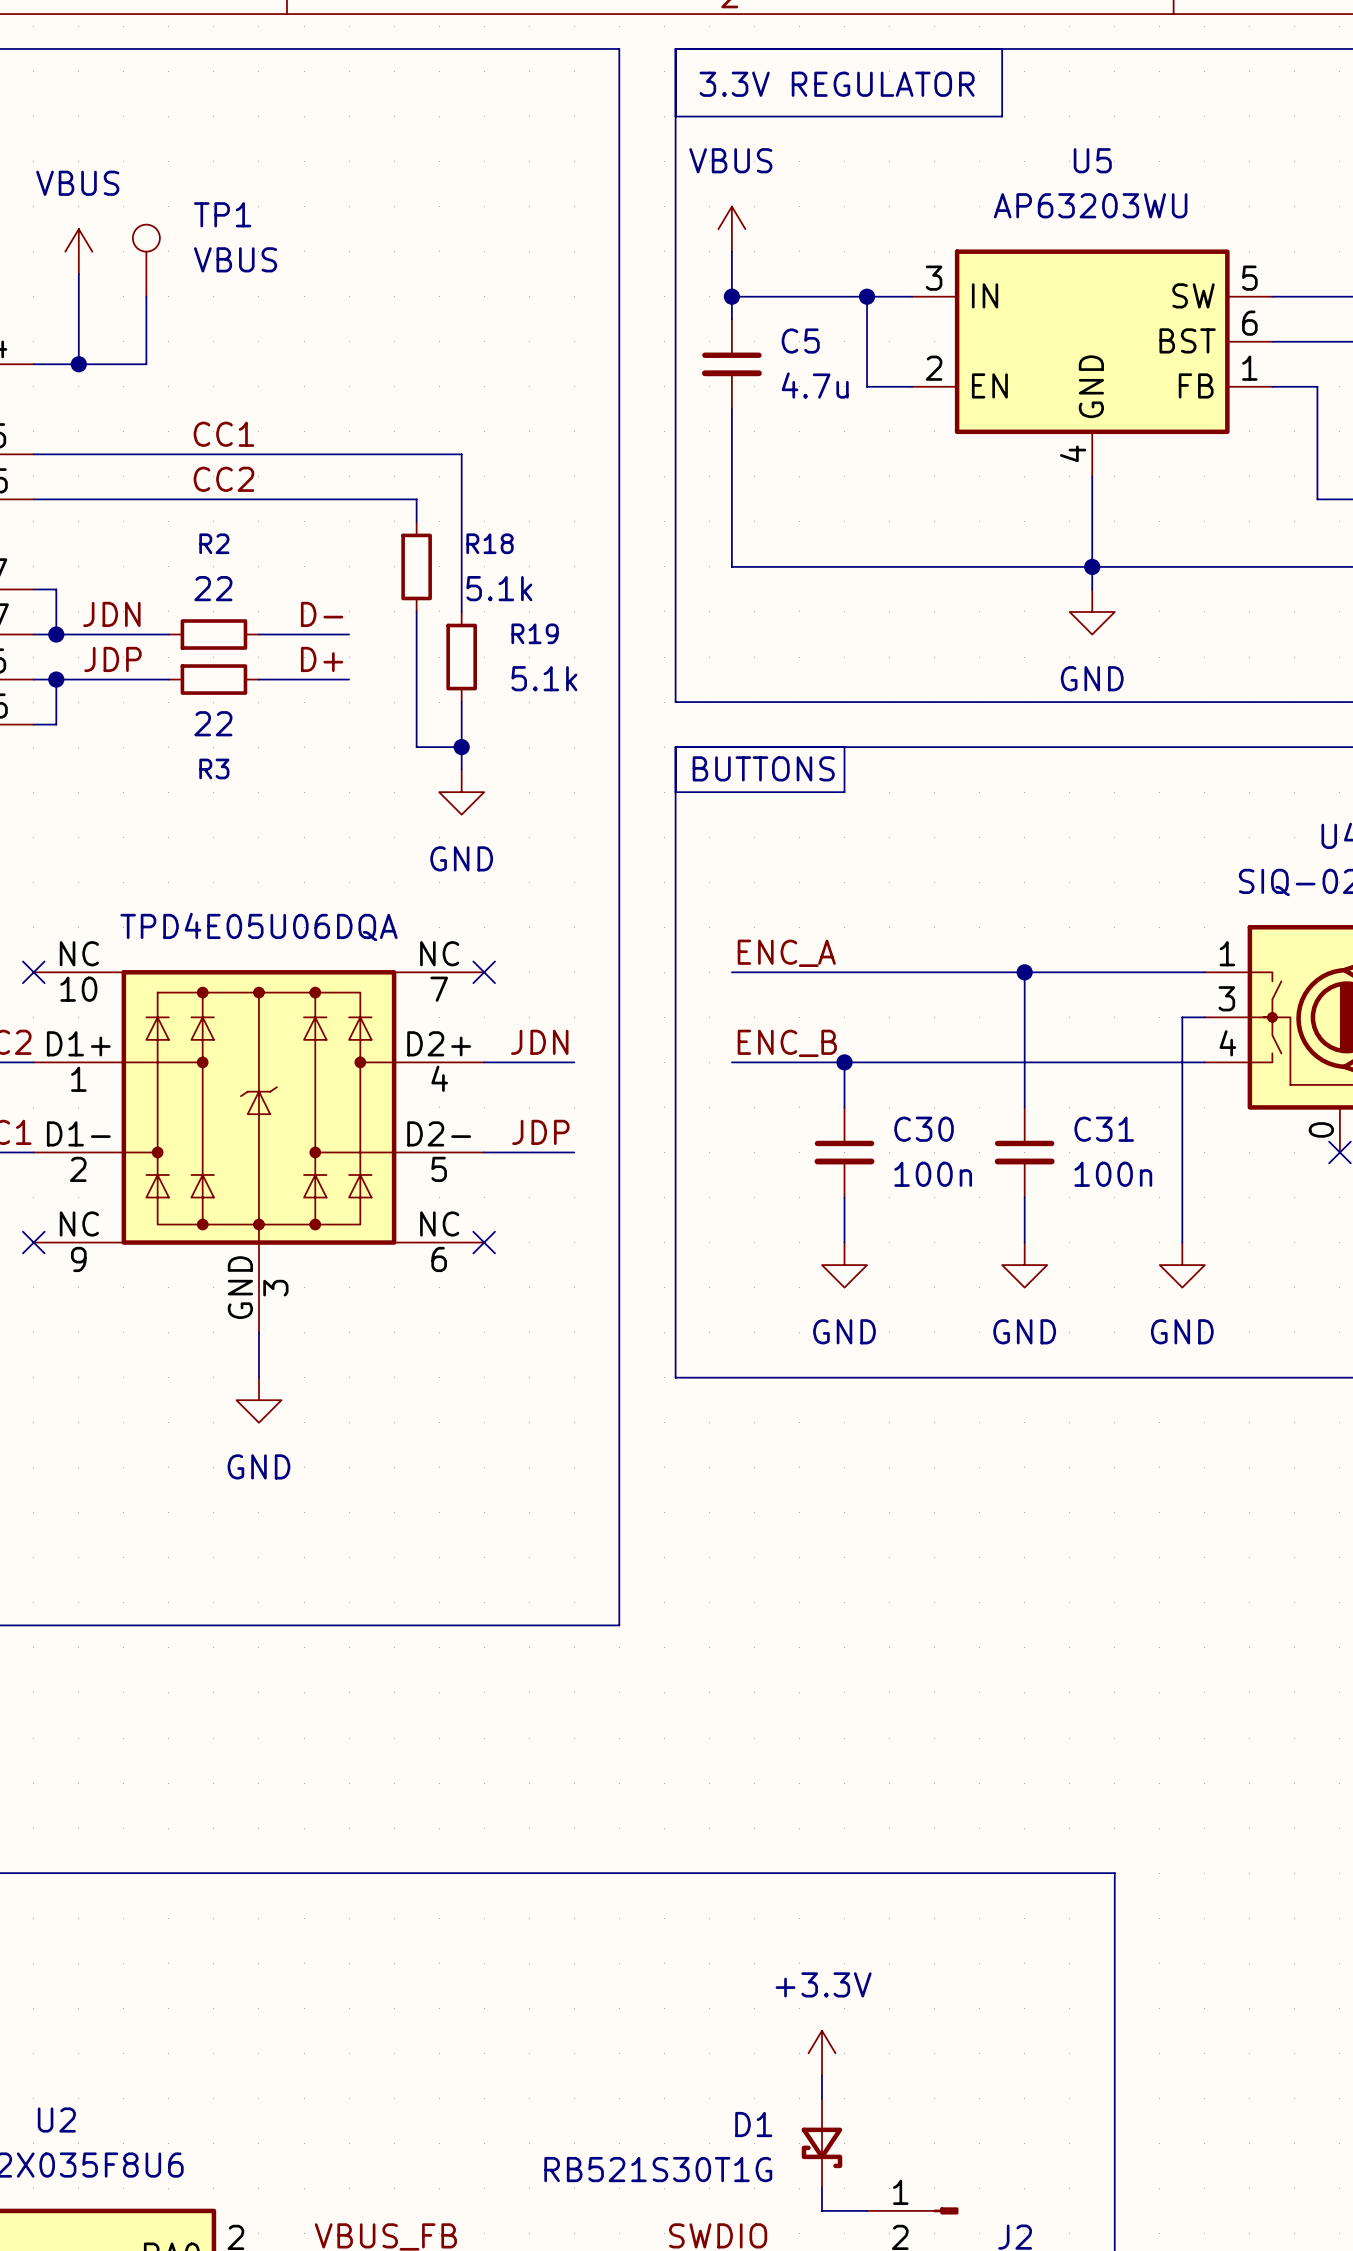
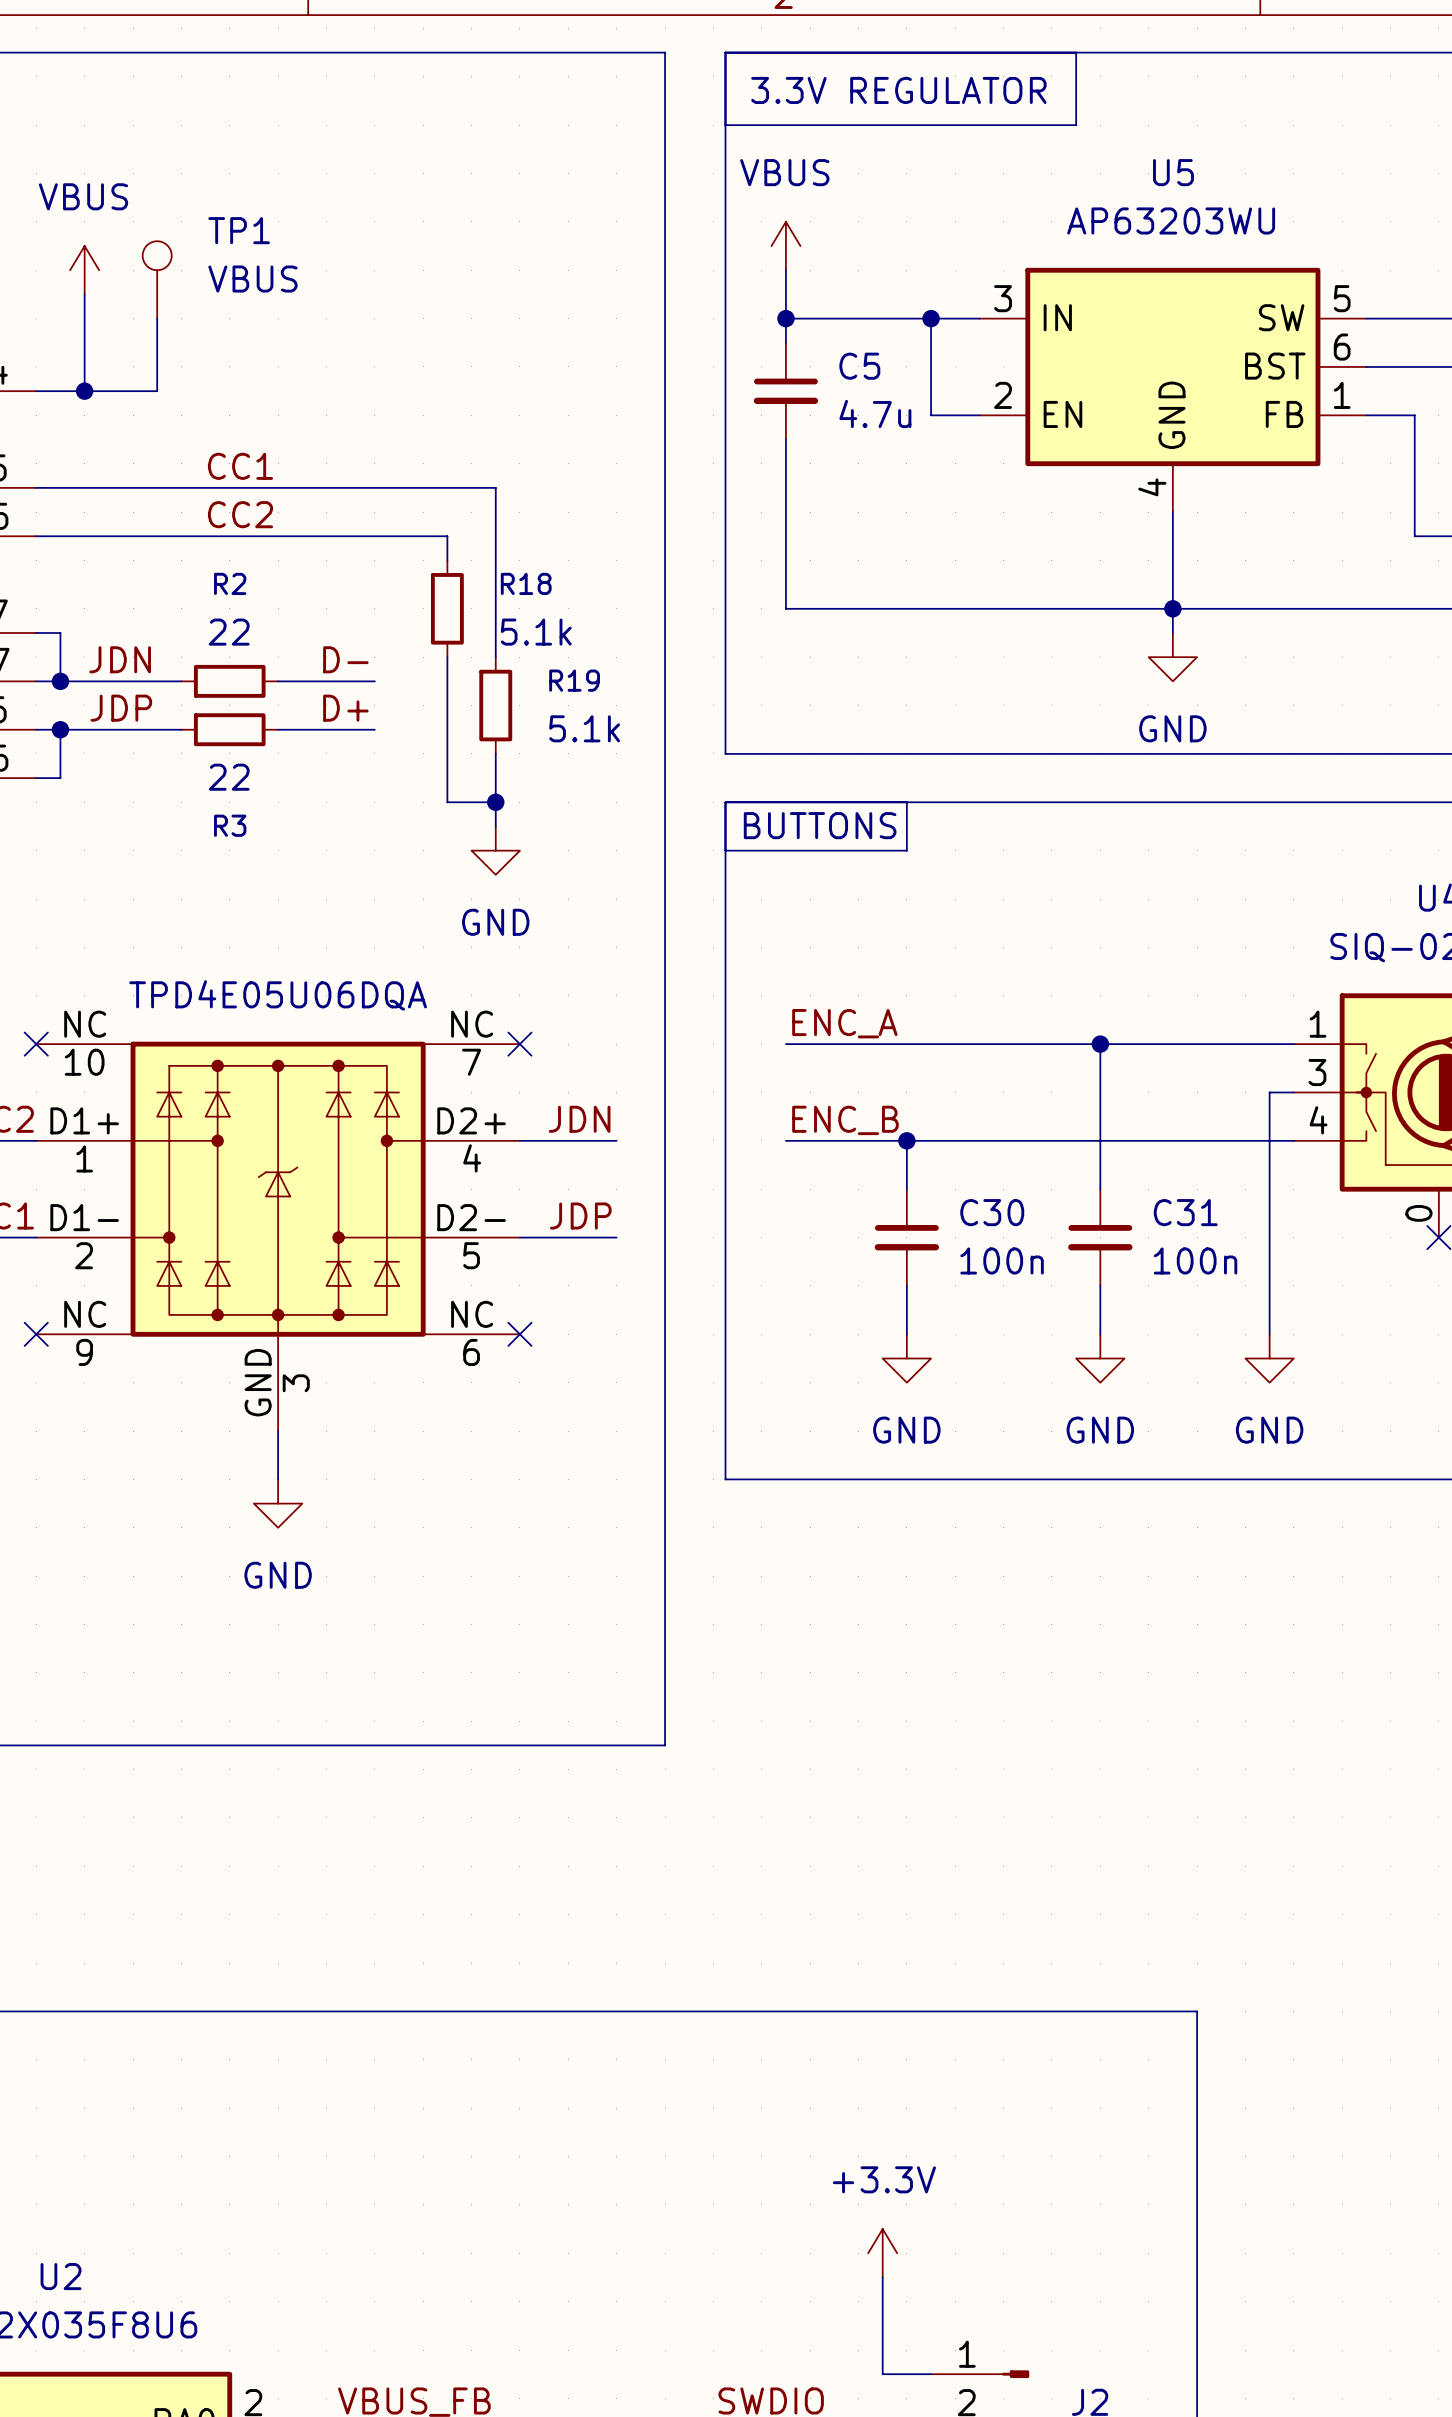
power symbol position: +3.3V (821, 2053) -> +3.3V (882, 2253)
D1: RB521S30T1G (821, 2143) -> none

